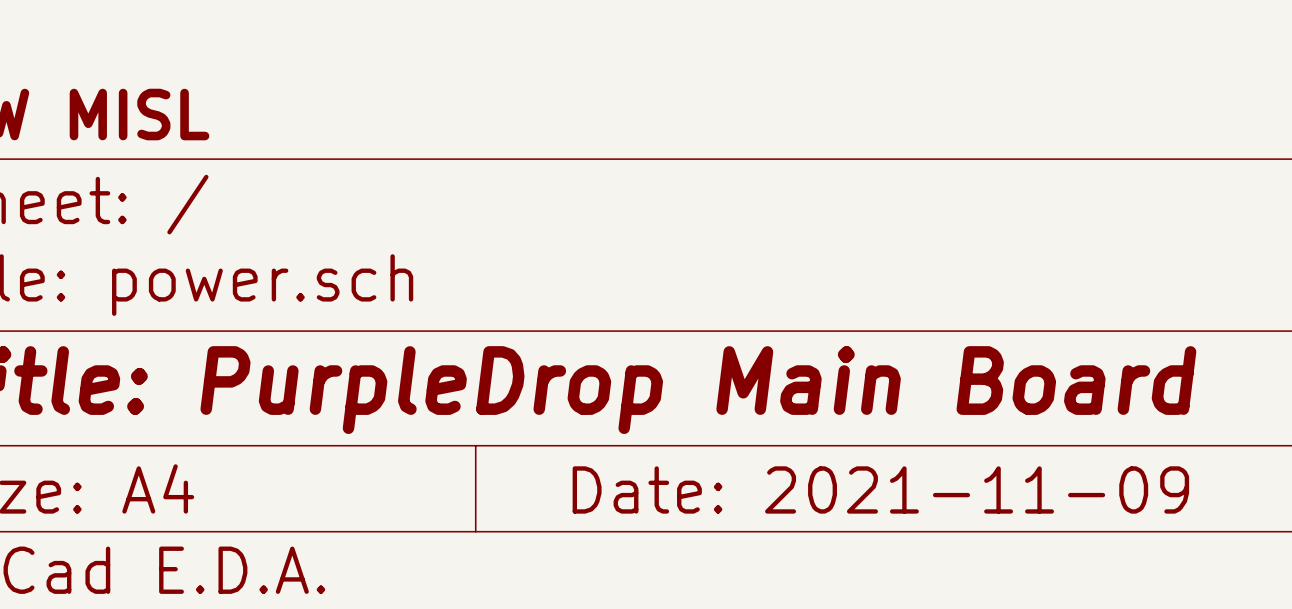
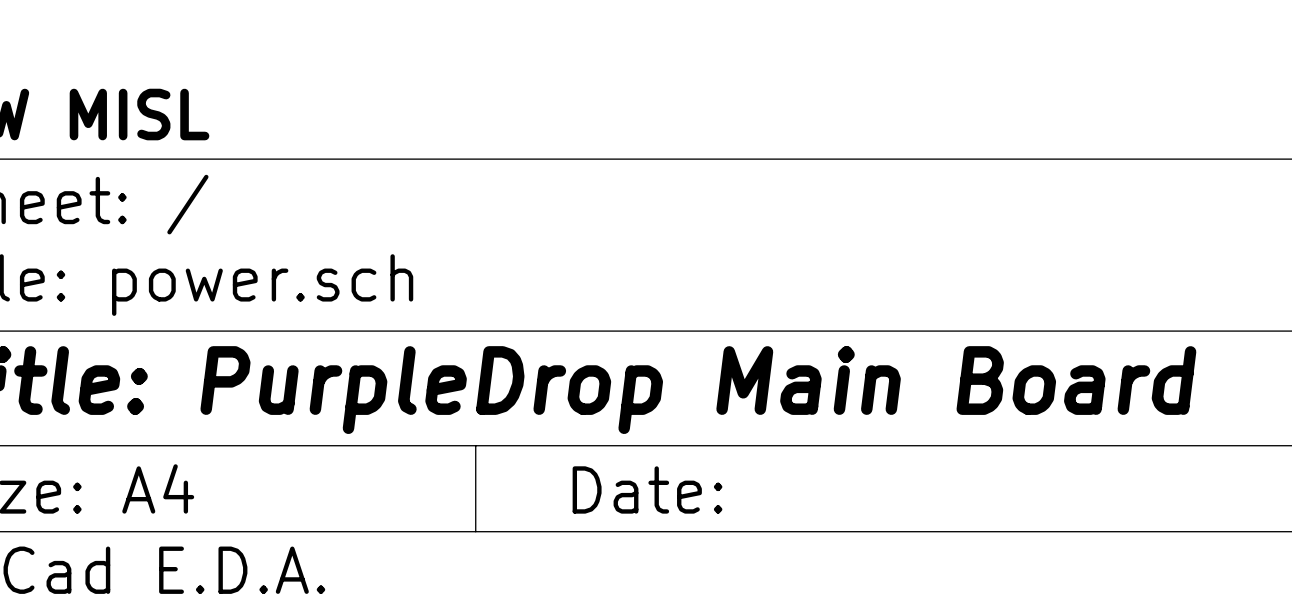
title block: Date: 2021-11-09 (880, 489) -> Date: (647, 489)

